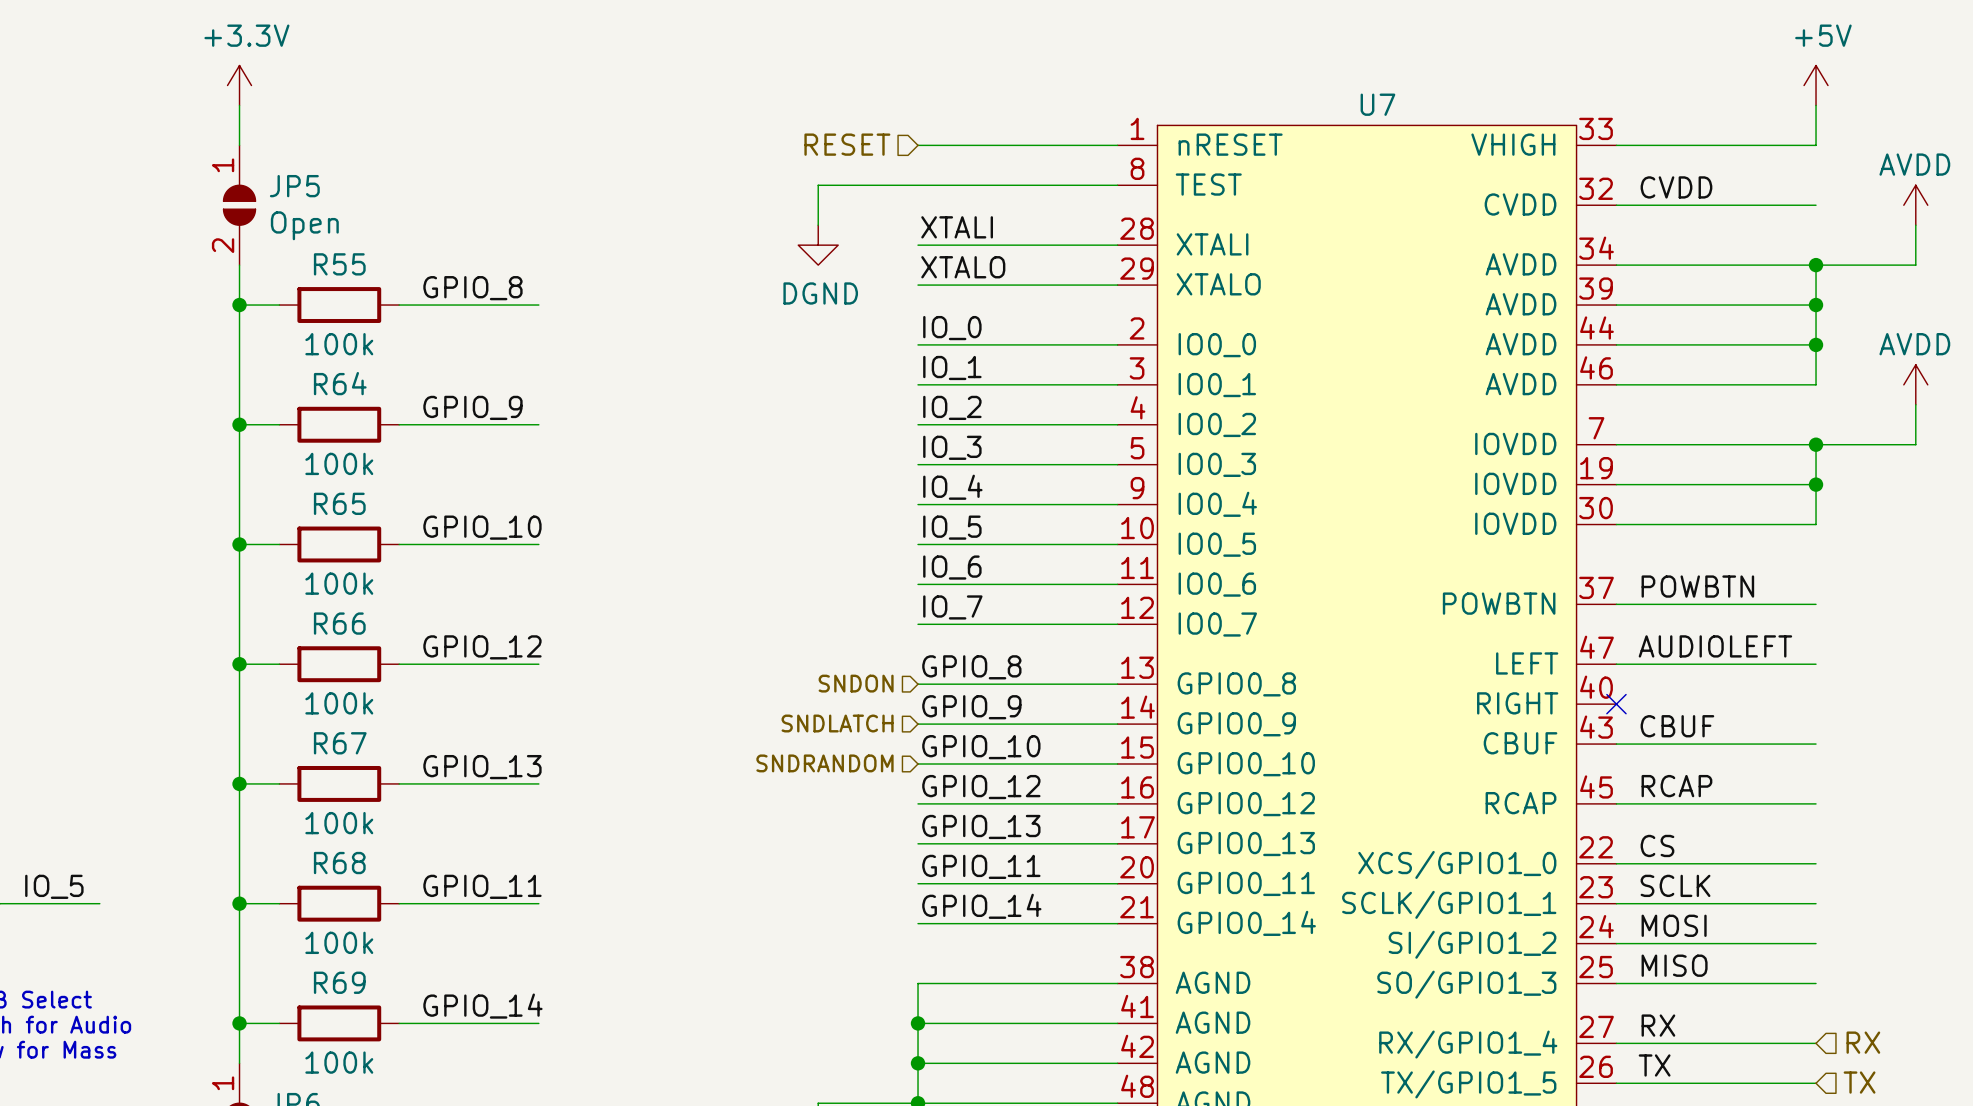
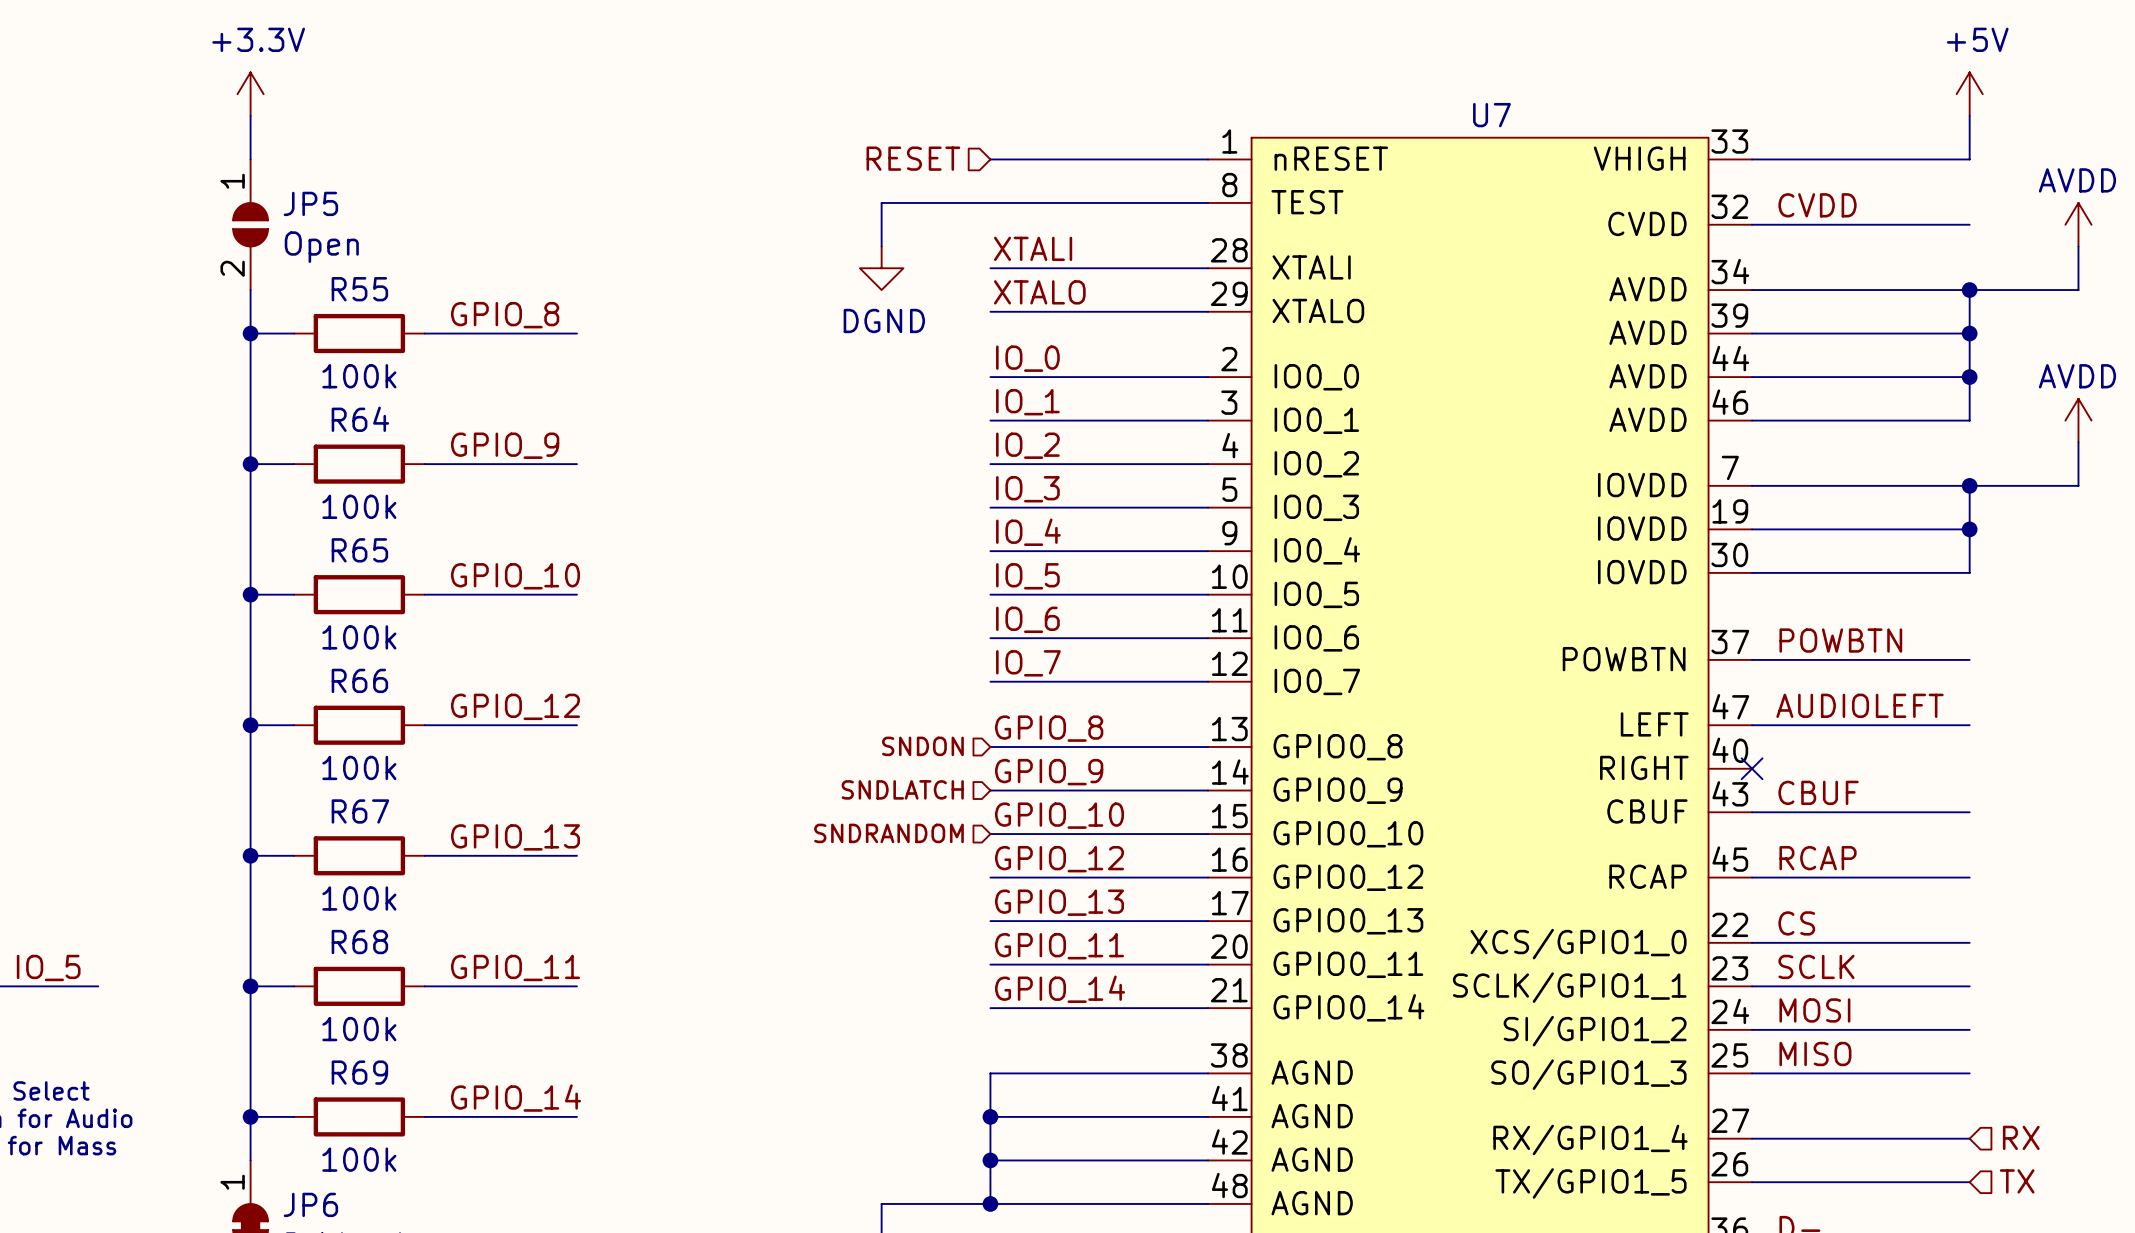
label: RX (1658, 1025) -> none
label: TX (1654, 1065) -> none

